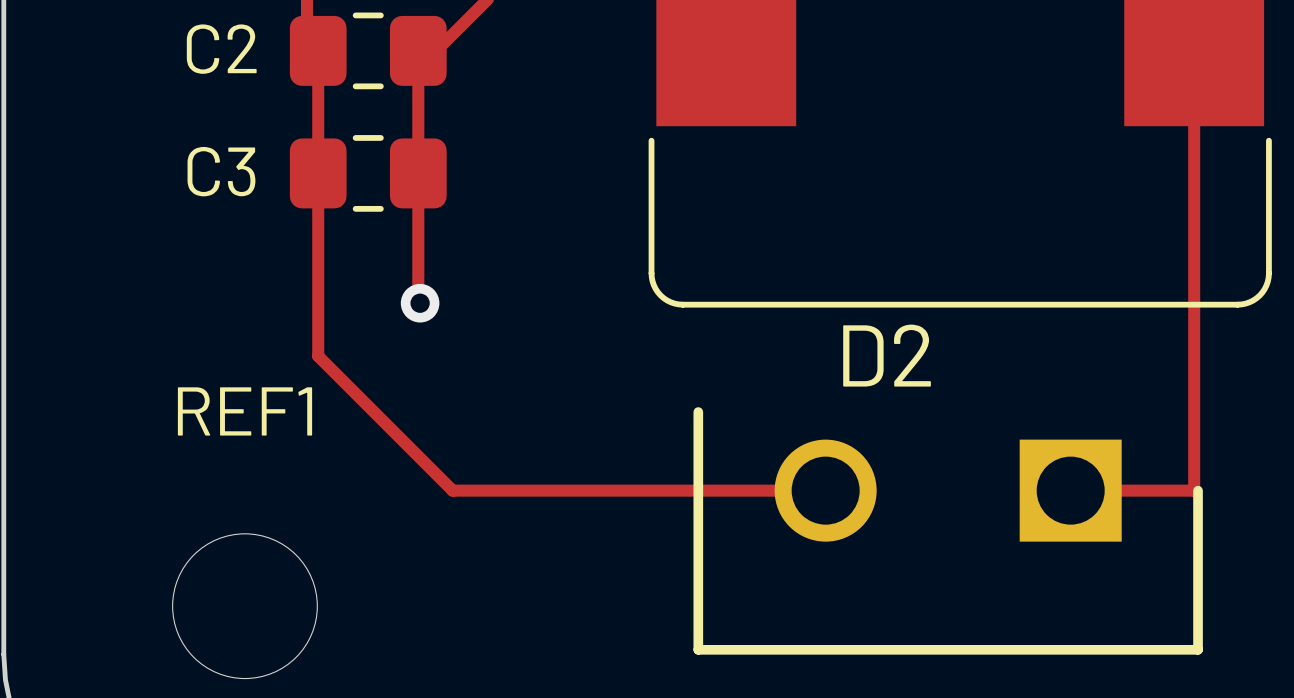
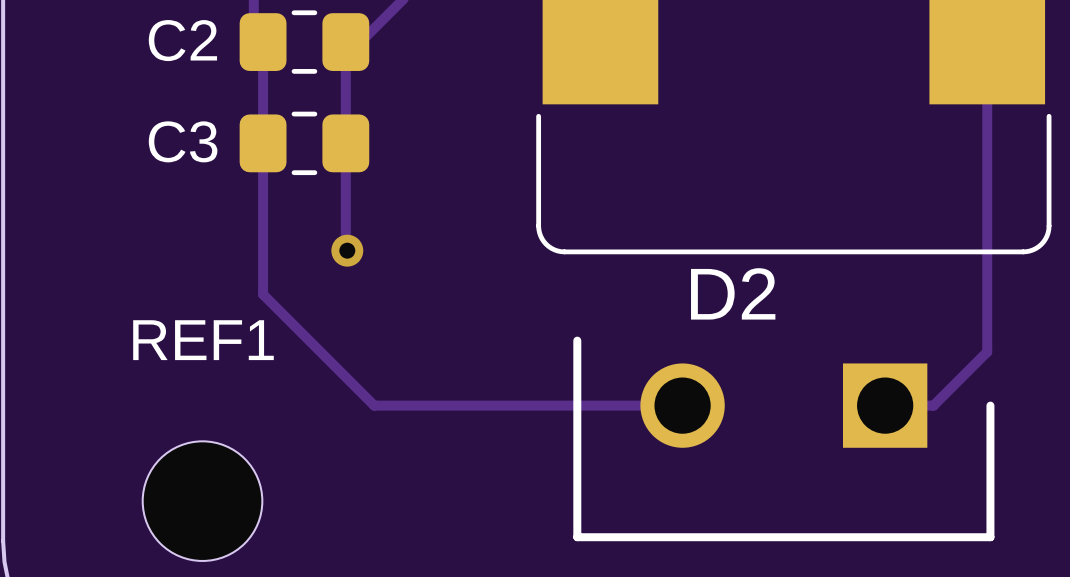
track: (1194, 425) (1194, 490) (1129, 490) -> (987, 351) (933, 405)

